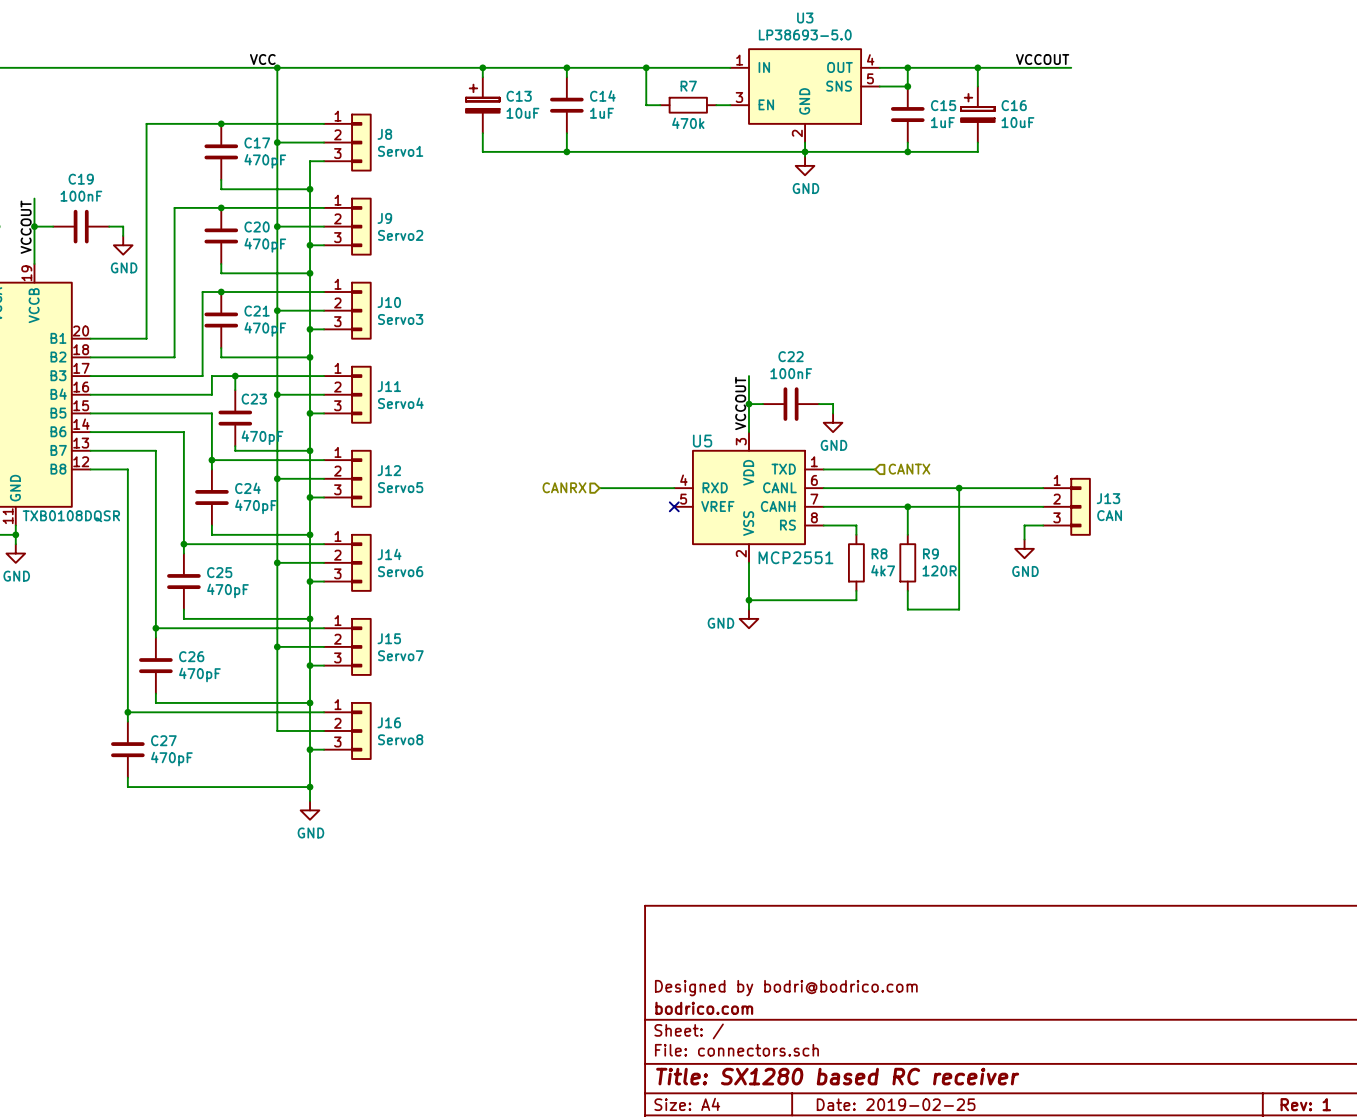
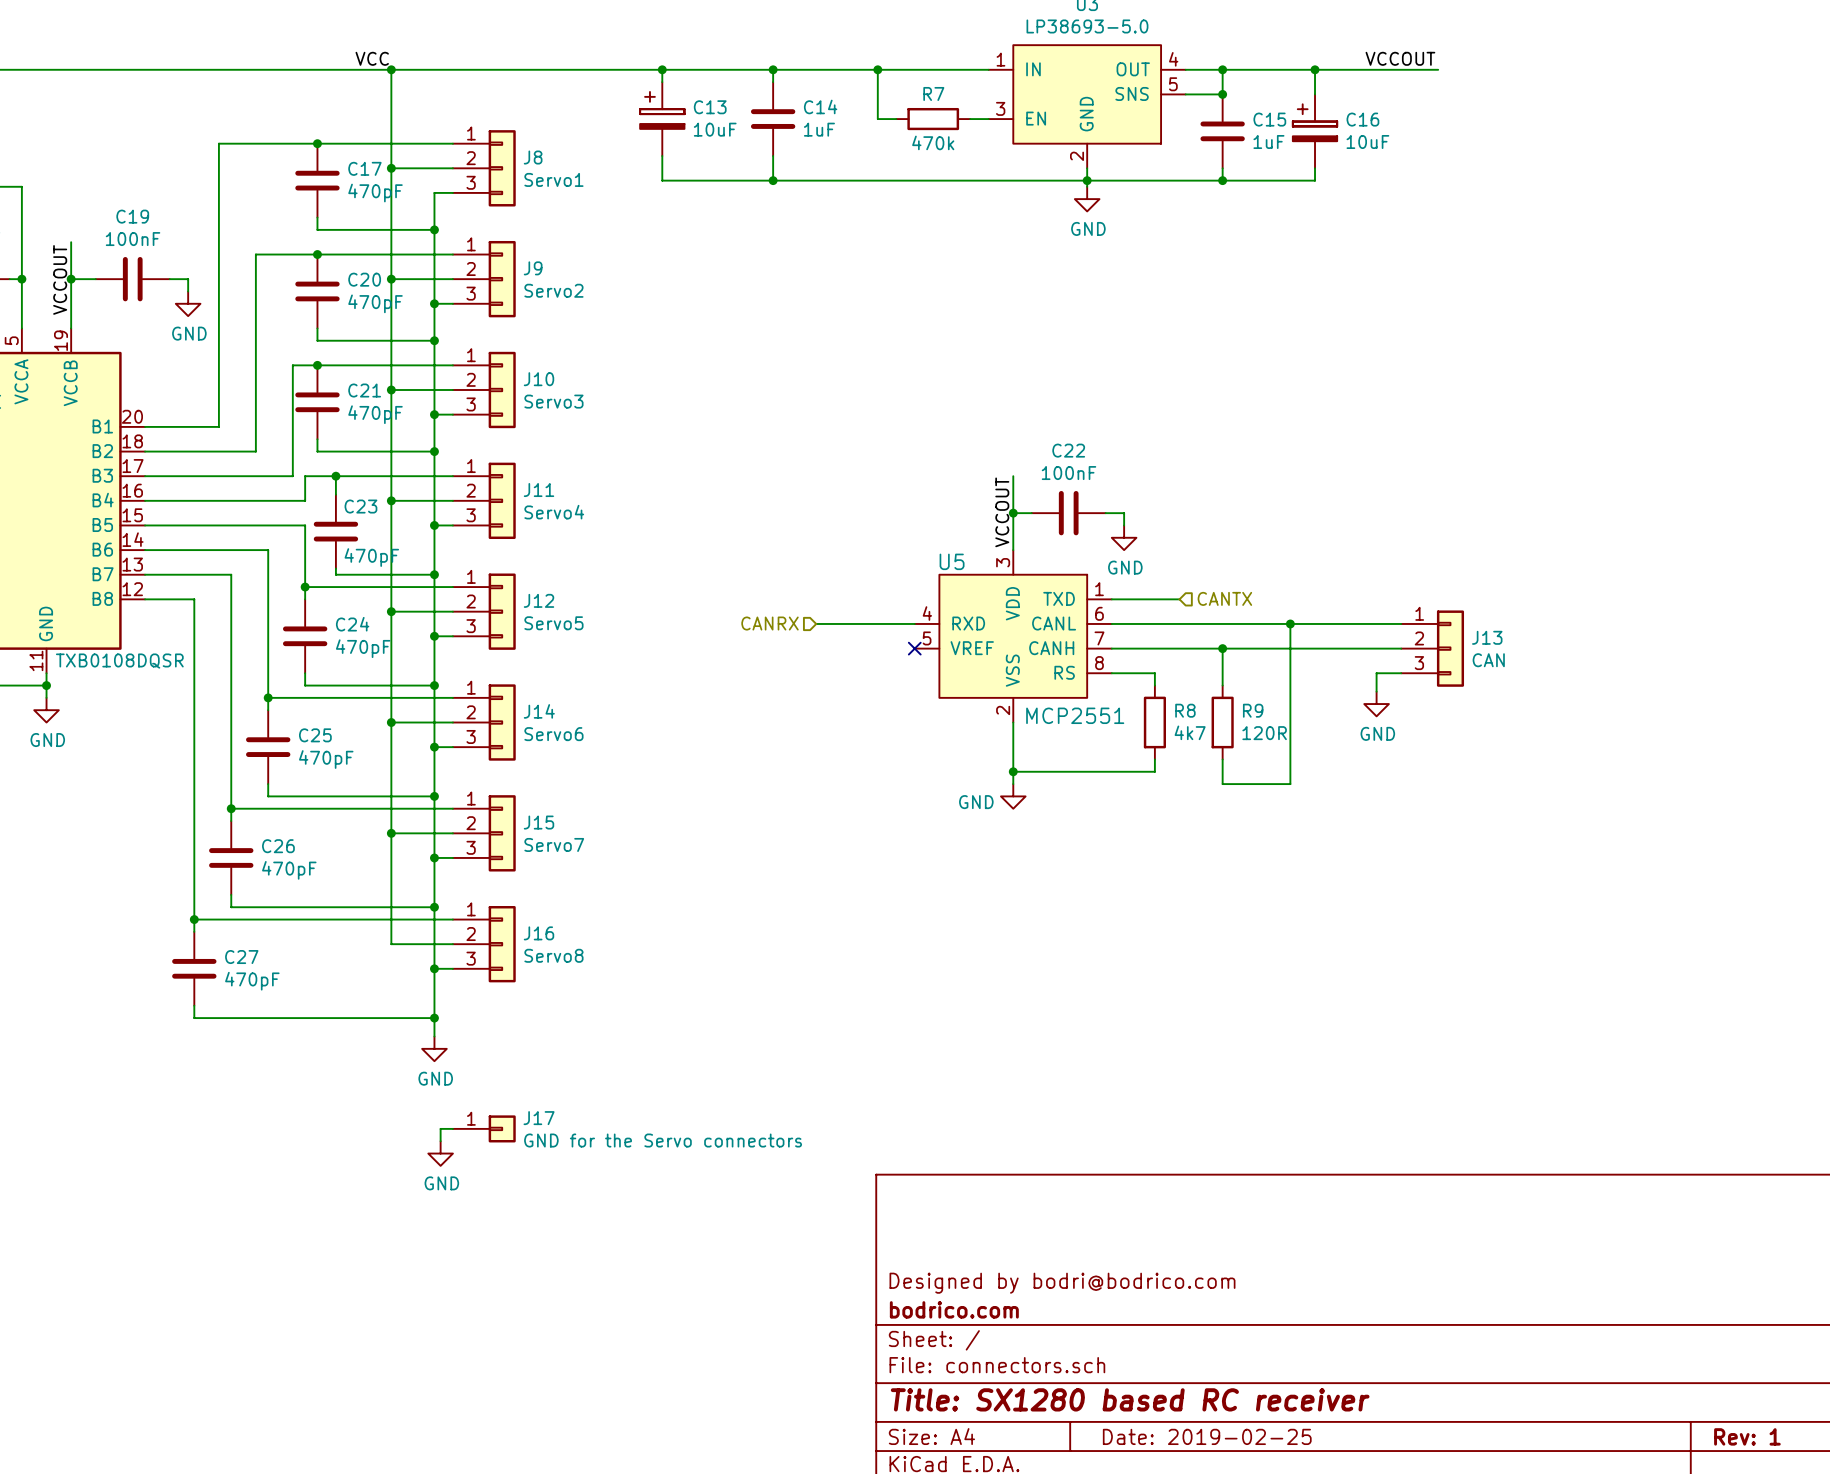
wire: none -> (452, 1128) (440, 1128) (440, 1141)
J17: none -> GND for the Servo connectors (484, 1128)
power symbol: none -> GND (440, 1153)

